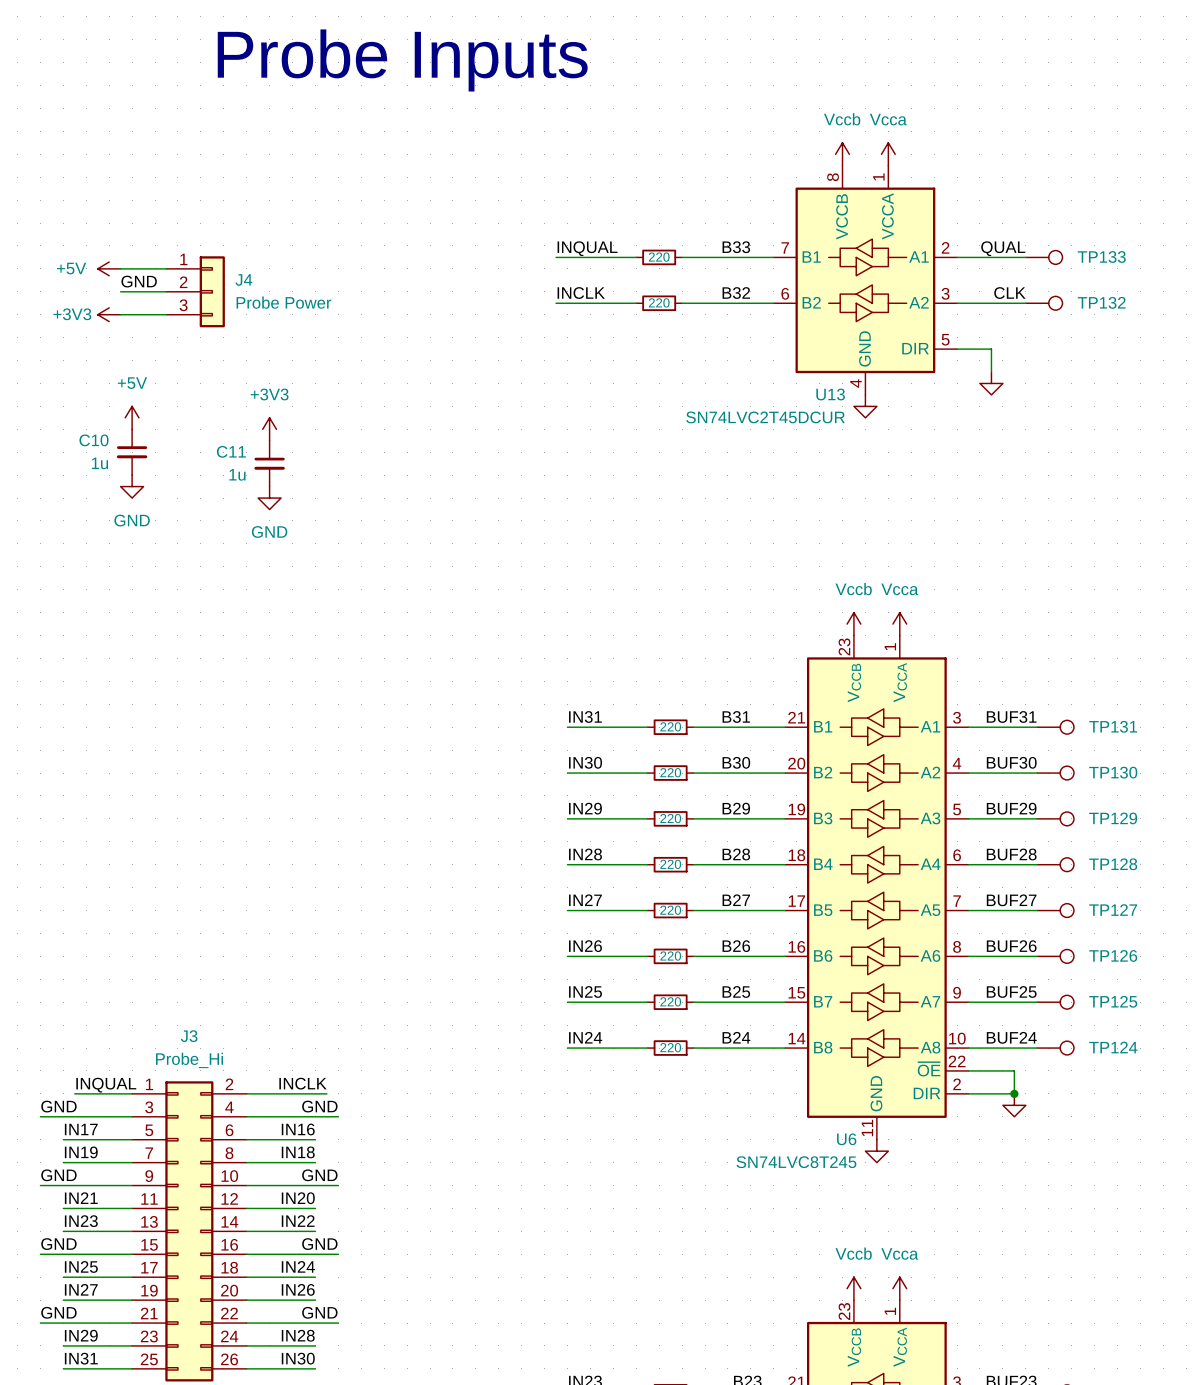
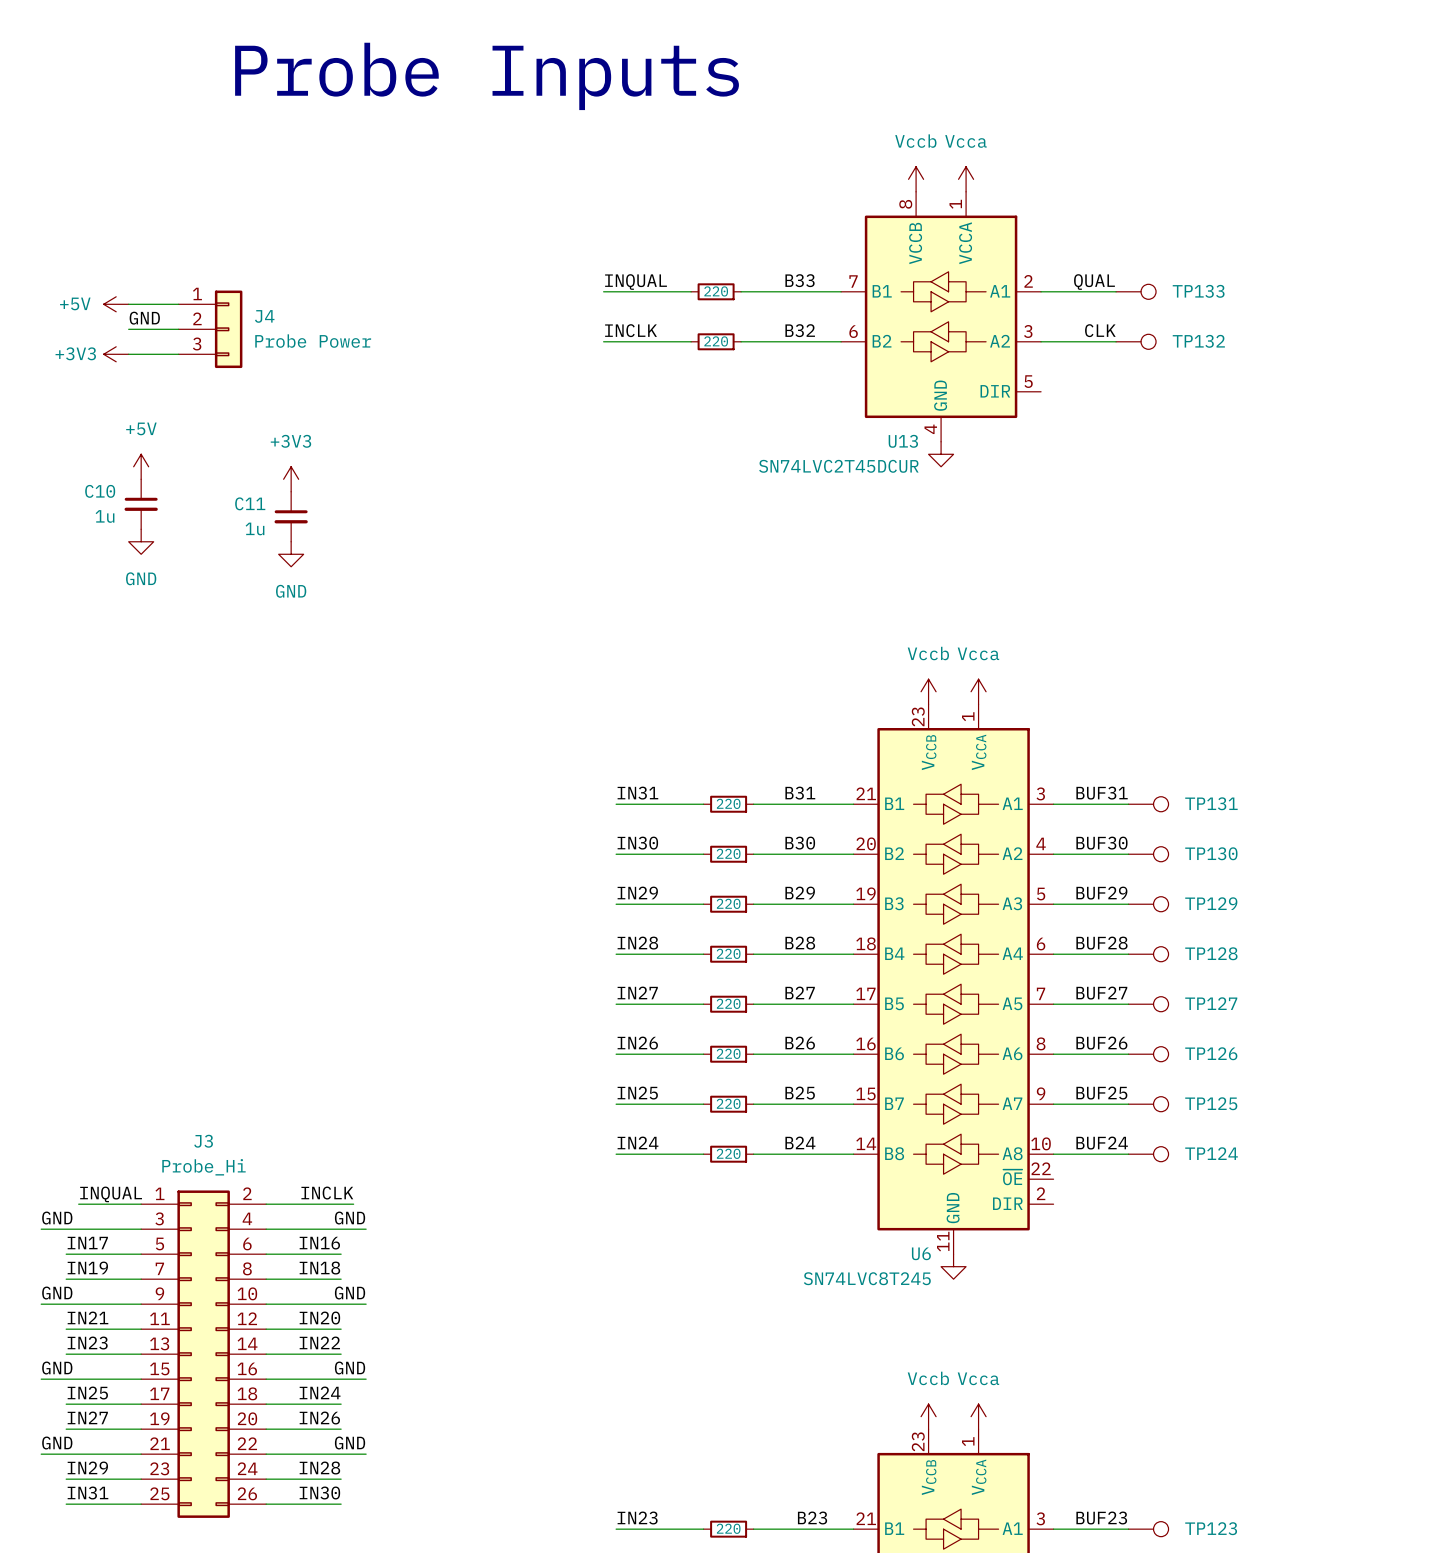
wire: (957, 349) (991, 349) (991, 372) -> none
power symbol: (991, 383) -> none
wire: (968, 1070) (1014, 1070) (1014, 1093) (968, 1093) -> none
junction: (1014, 1093) -> none
power symbol: (1014, 1105) -> none

